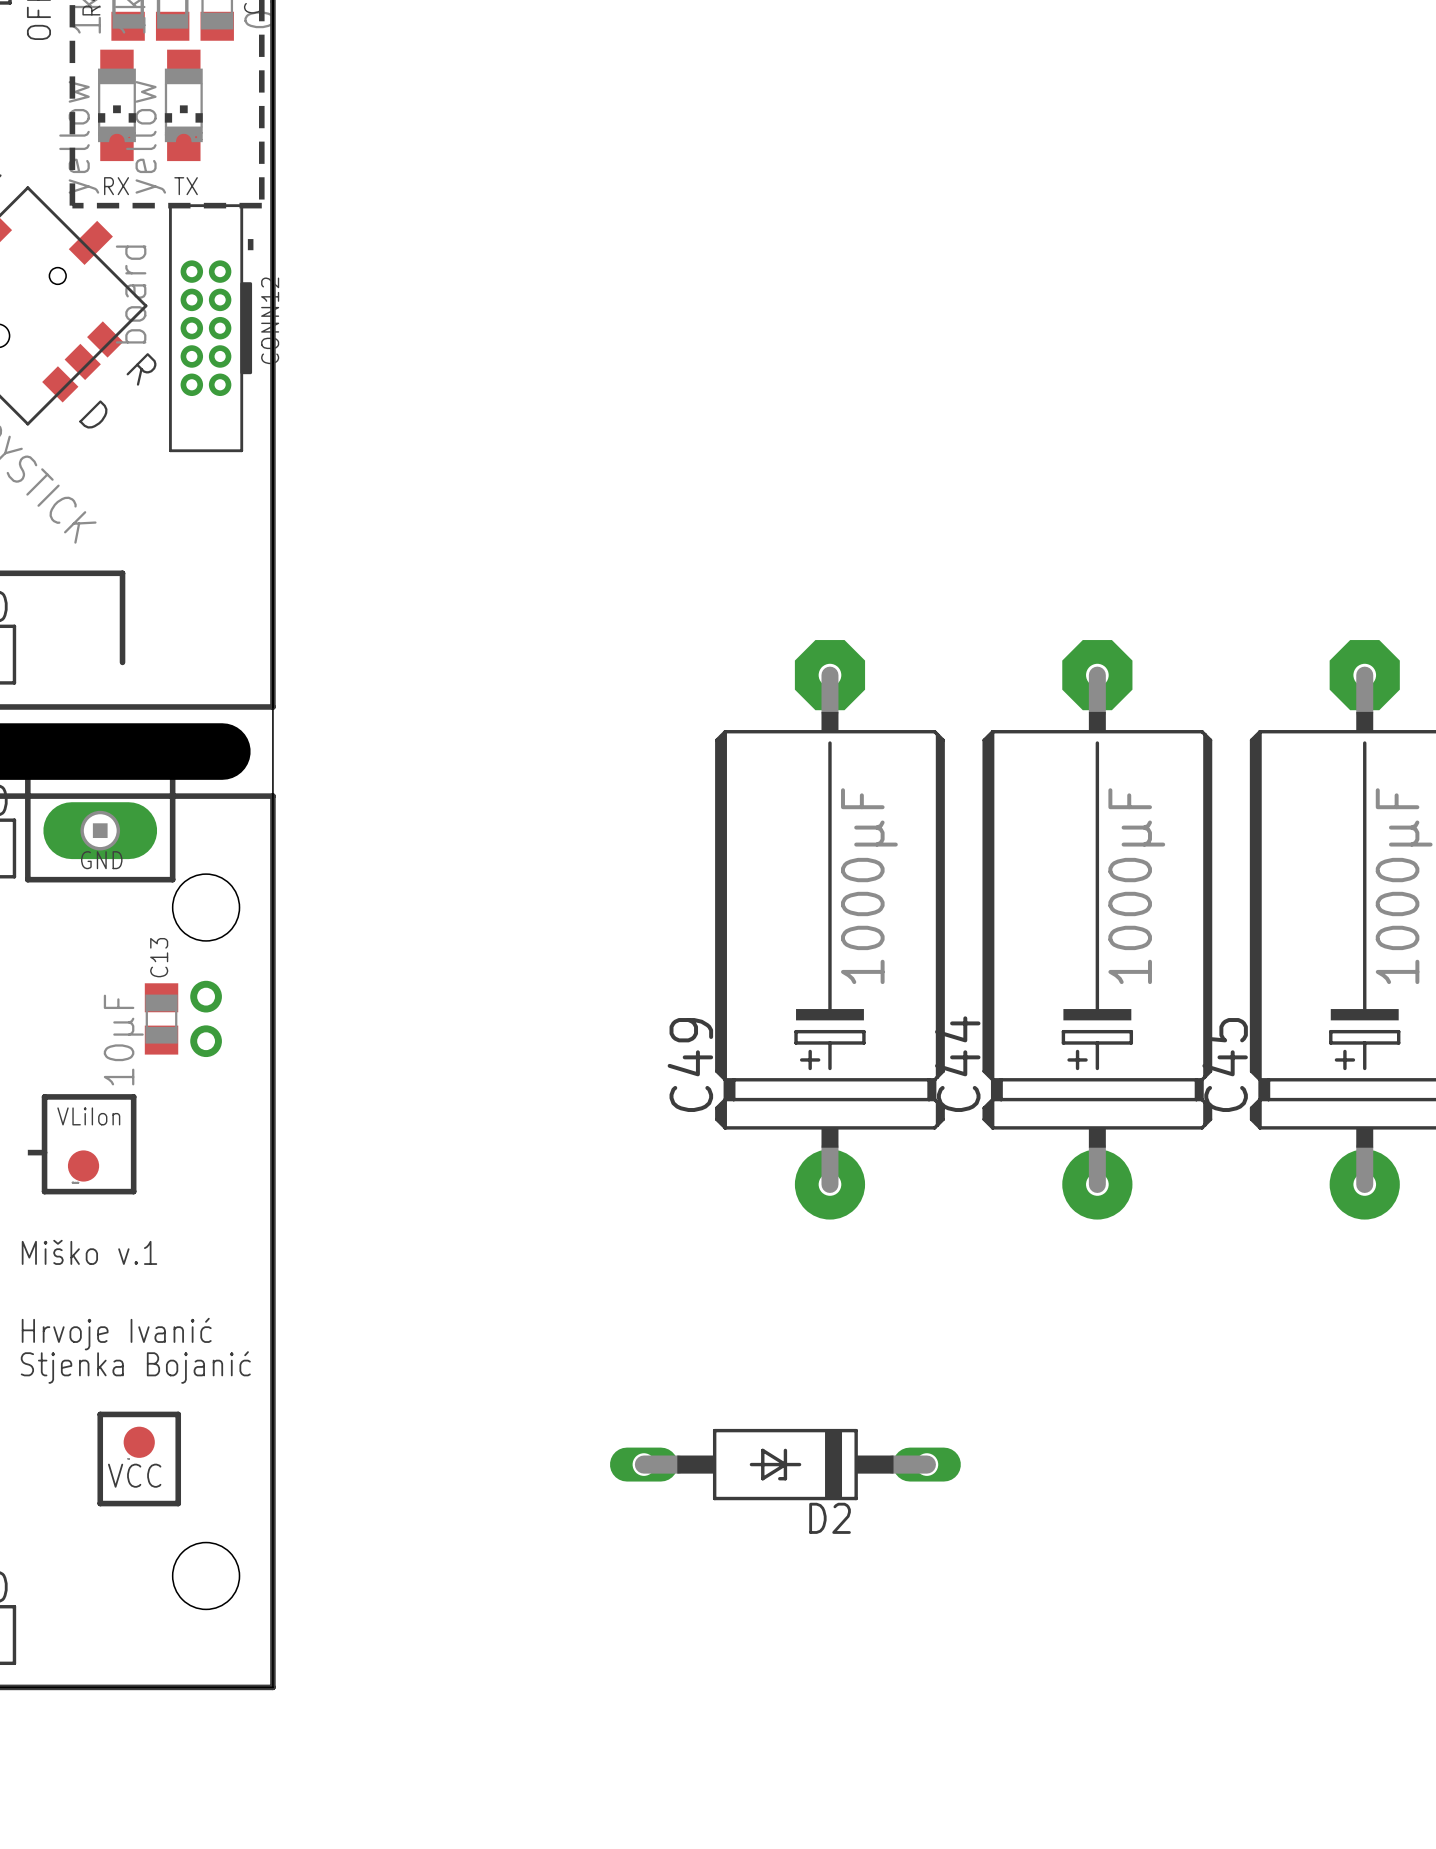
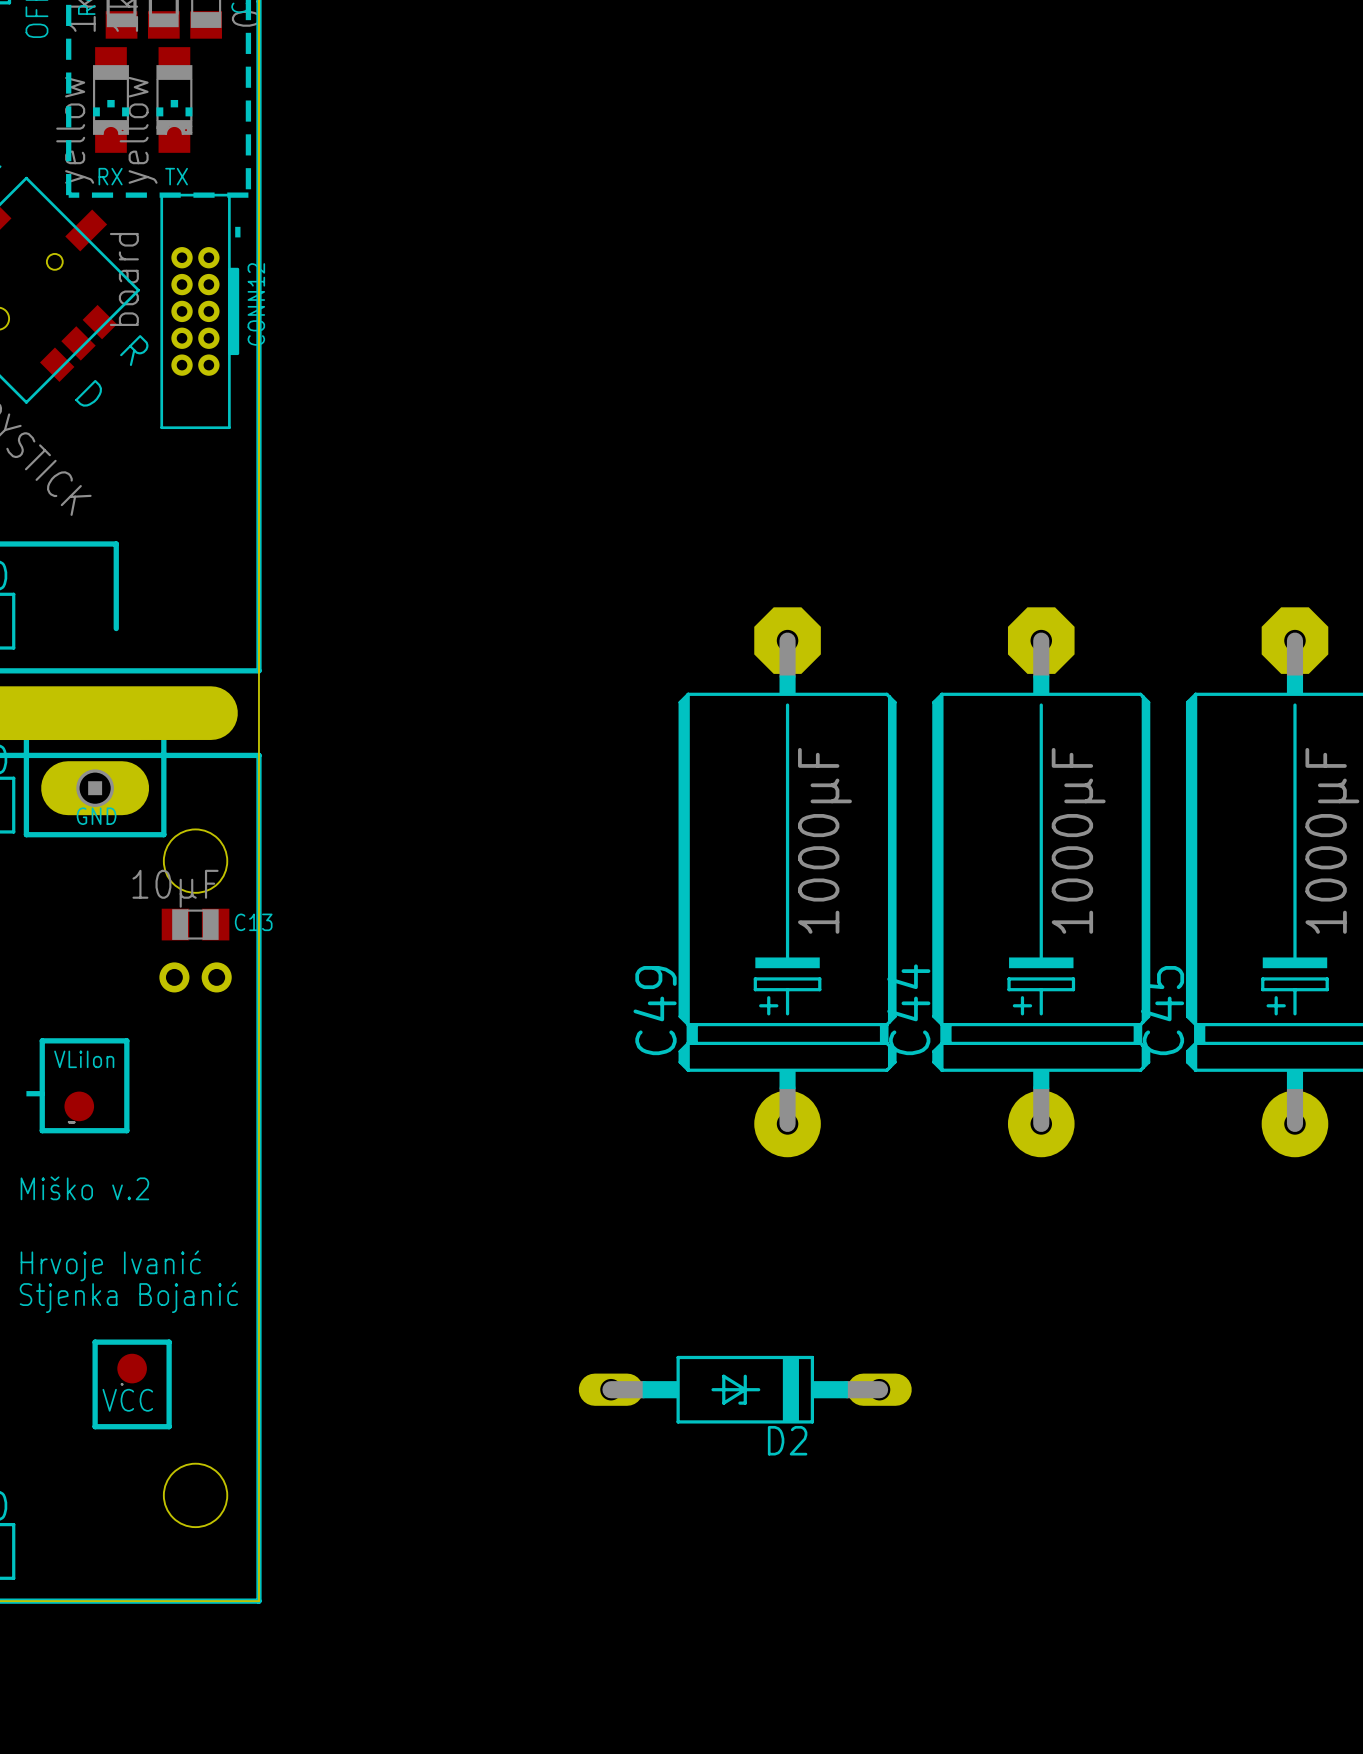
C13 rotation: 0° (161, 1018) -> 90° clockwise (195, 924)
C13 position: (161, 1018) -> (195, 924)
part rotation: 0° (206, 1018) -> 90° clockwise (195, 977)
text: Miško v.1 (89, 1252) -> Miško v.2 (84, 1188)

